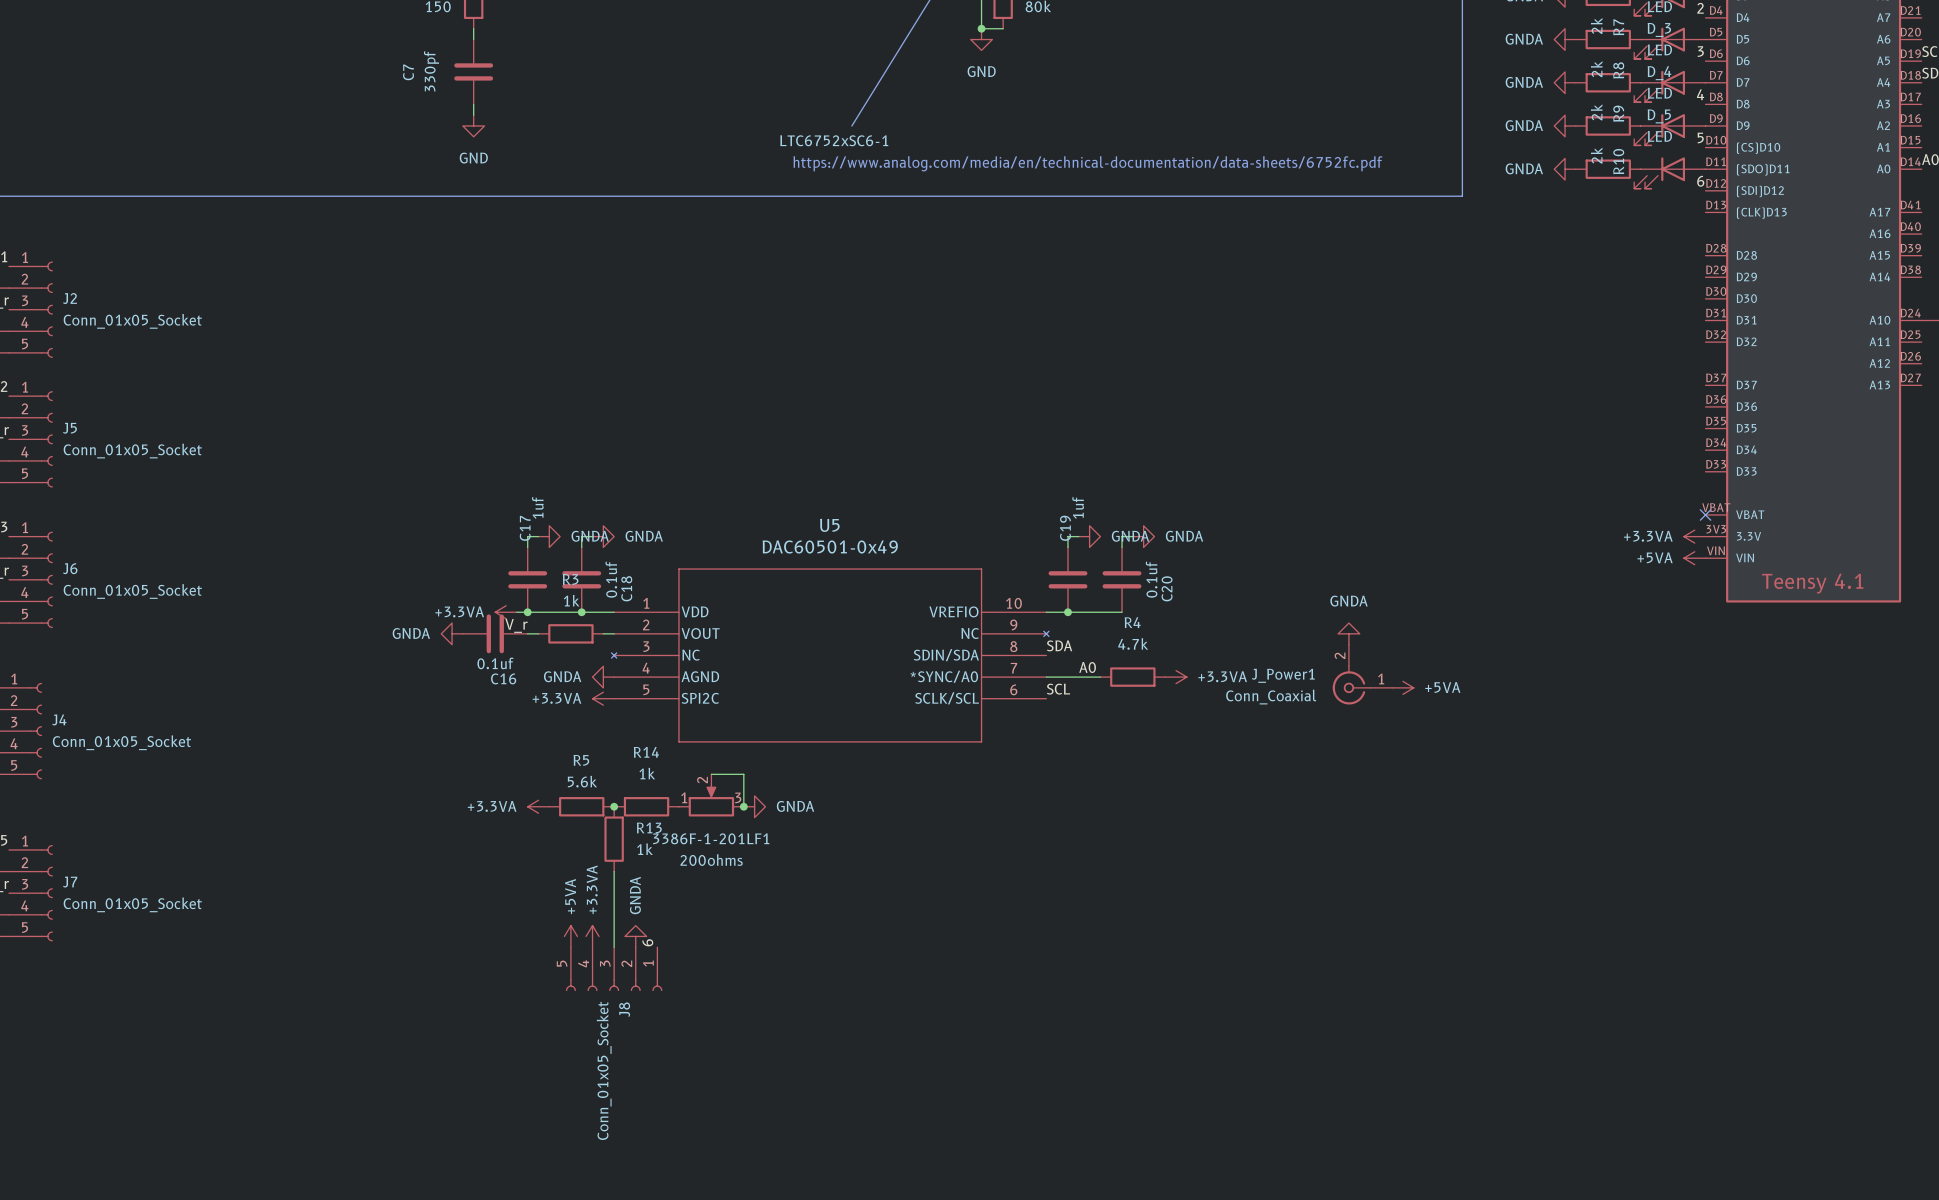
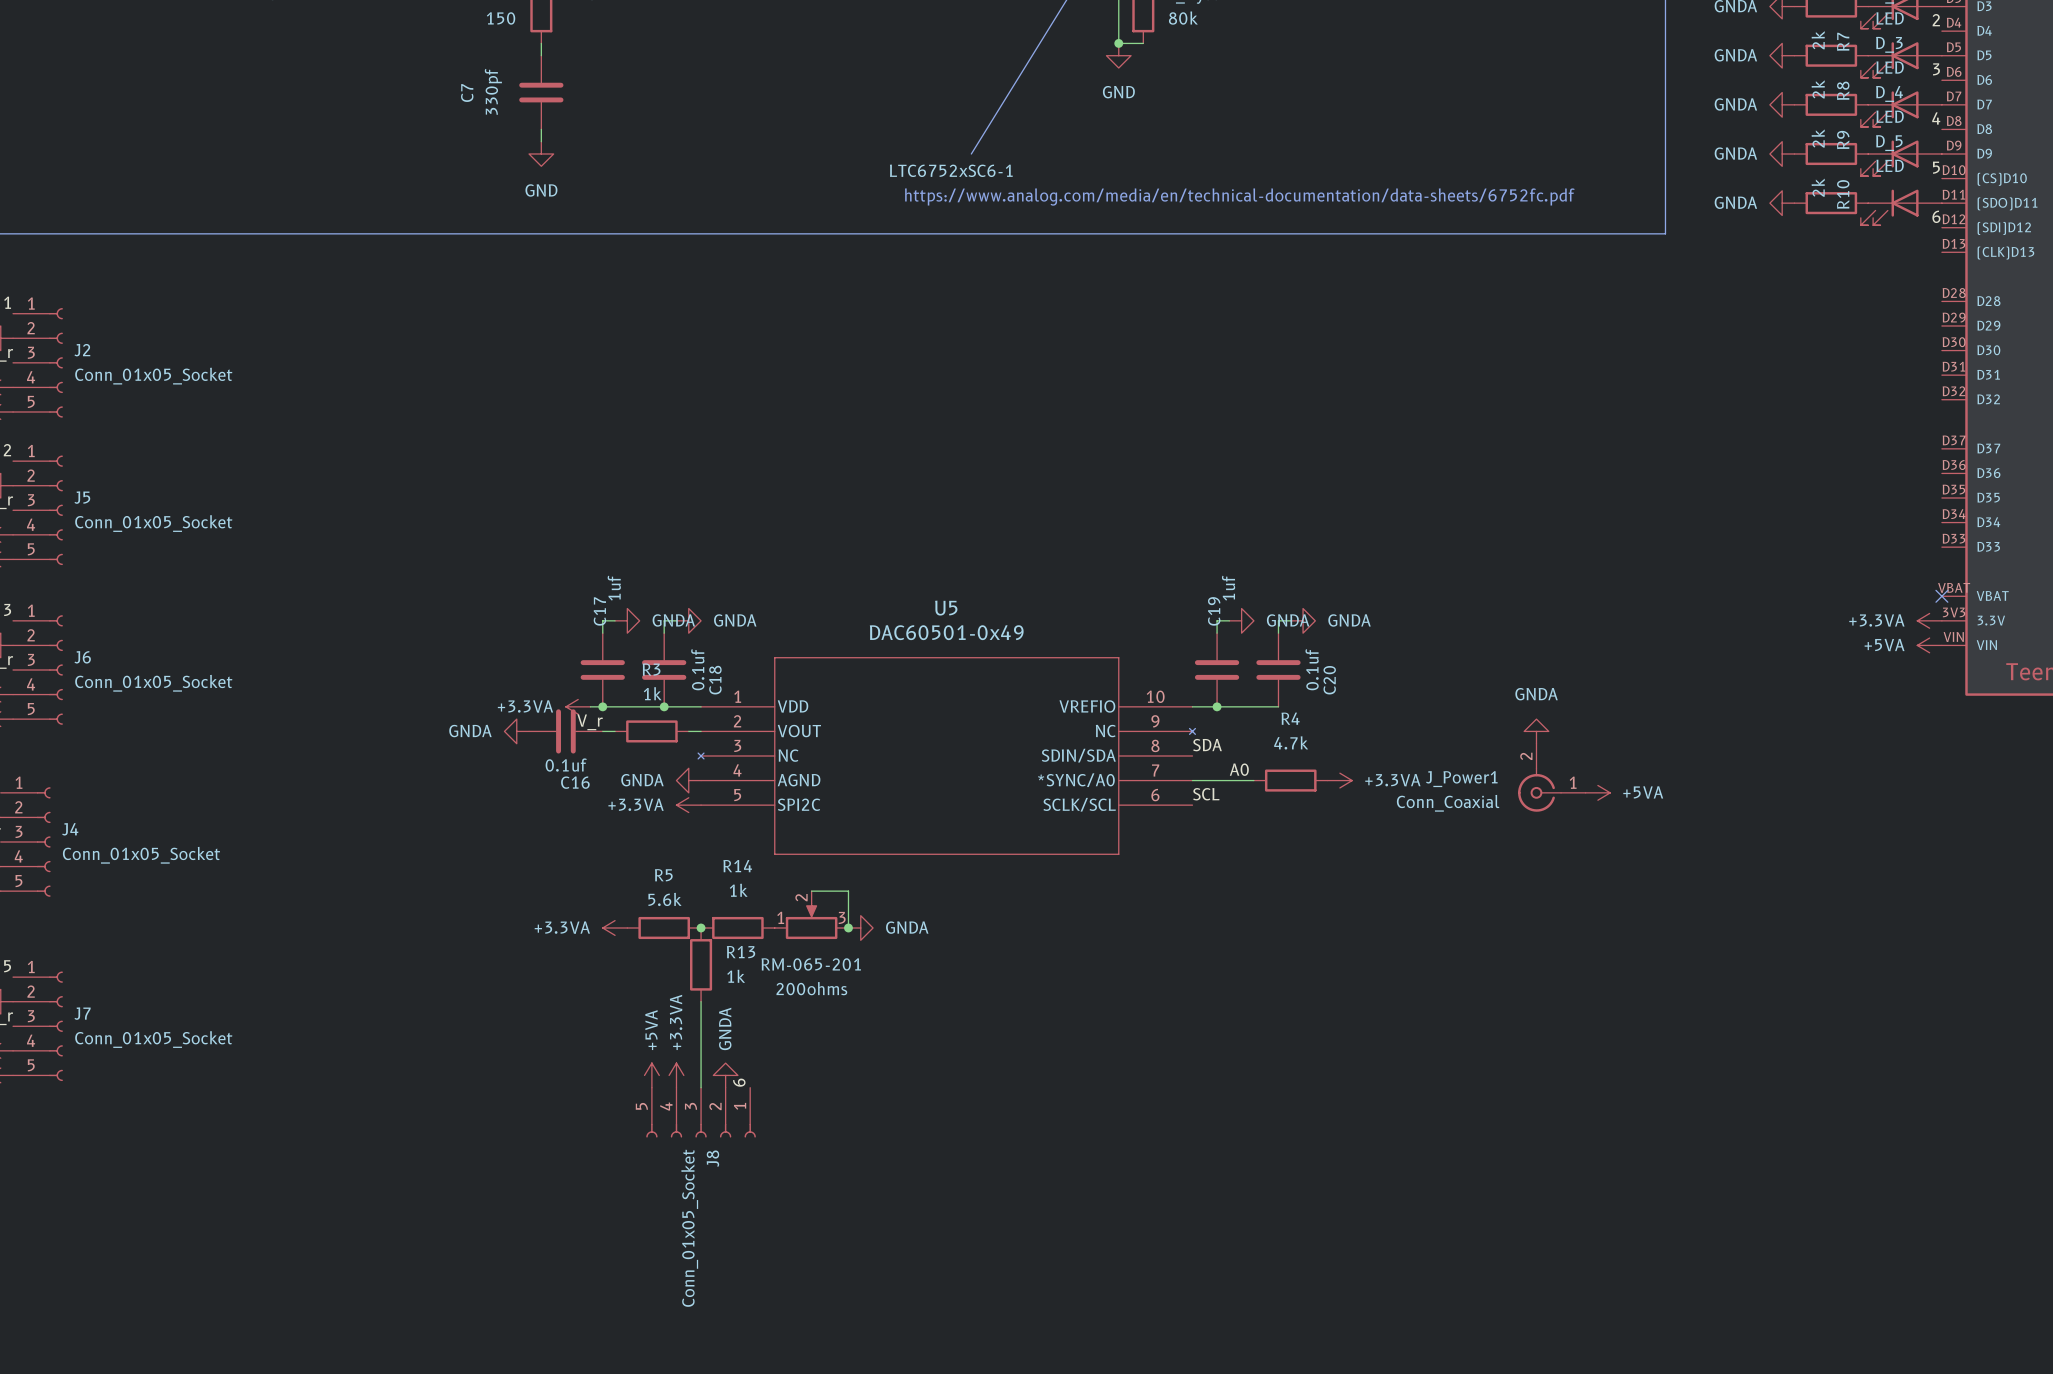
3386F-1-201LF1 name: 3386F-1-201LF1 (711, 838) -> RM-065-201 (811, 964)

